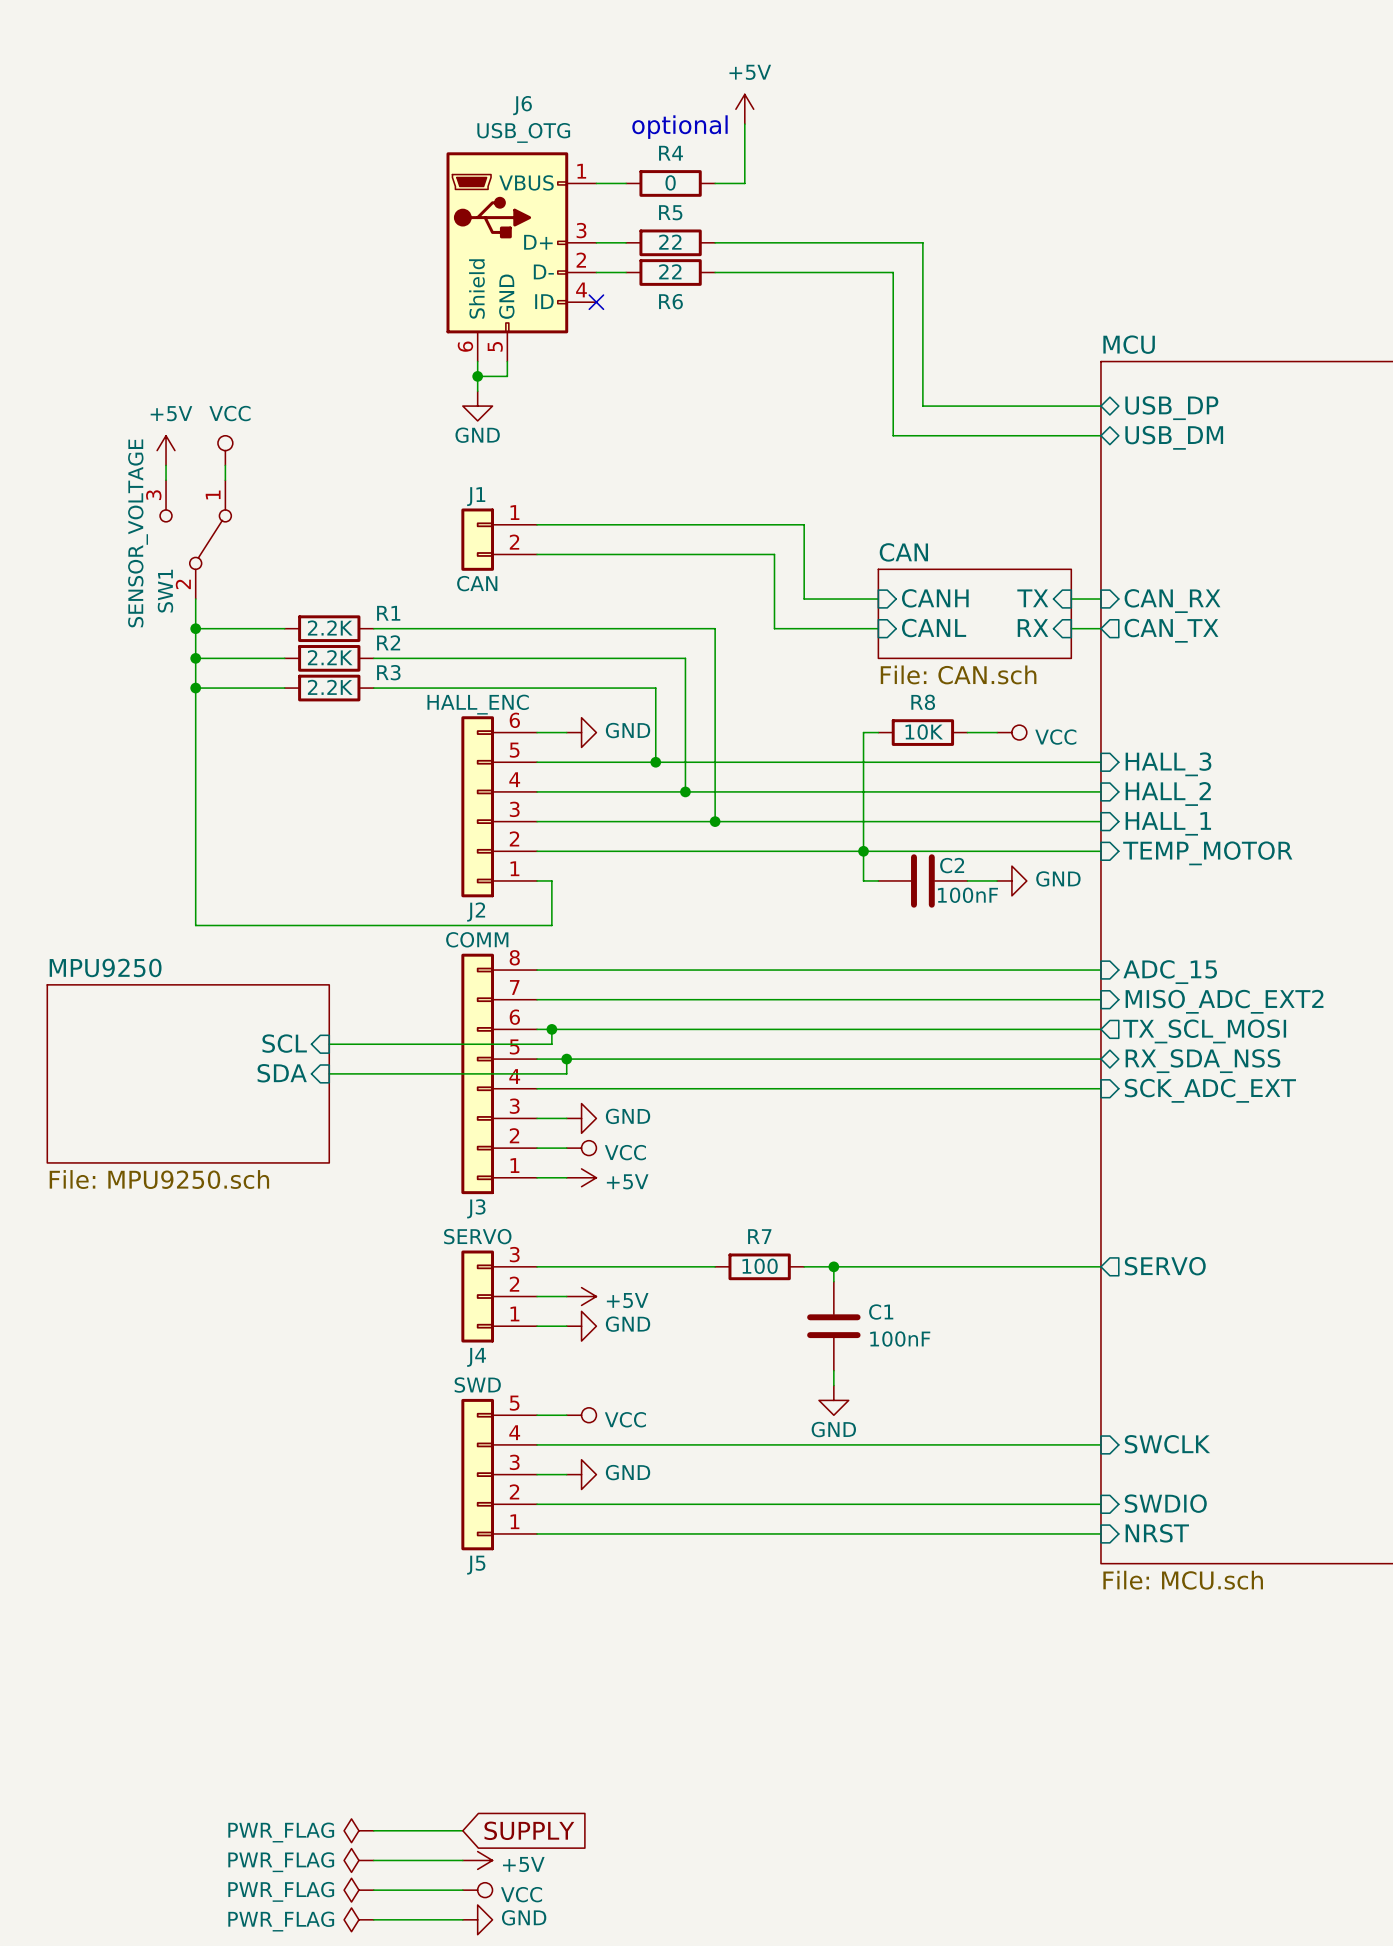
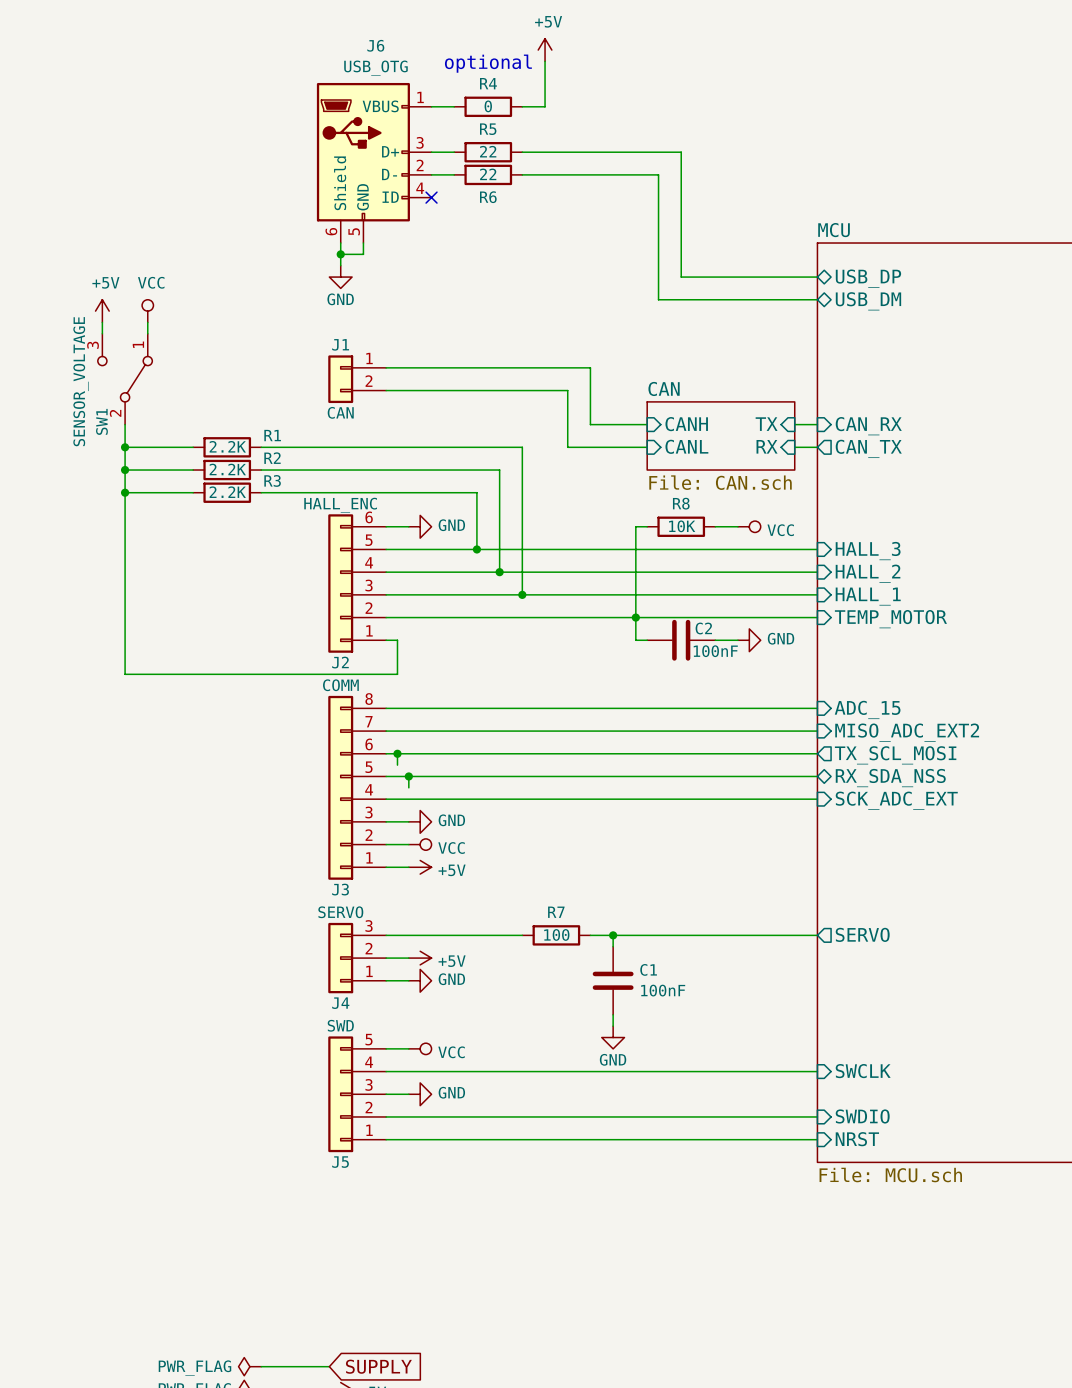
sheet pin: SCL (284, 1043) -> none
wire: (329, 1044) (551, 1044) -> none
sheet MPU9250: File: MPU9250.sch (188, 1073) -> none
sheet pin: SDA (282, 1073) -> none
wire: (329, 1073) (566, 1073) -> none

